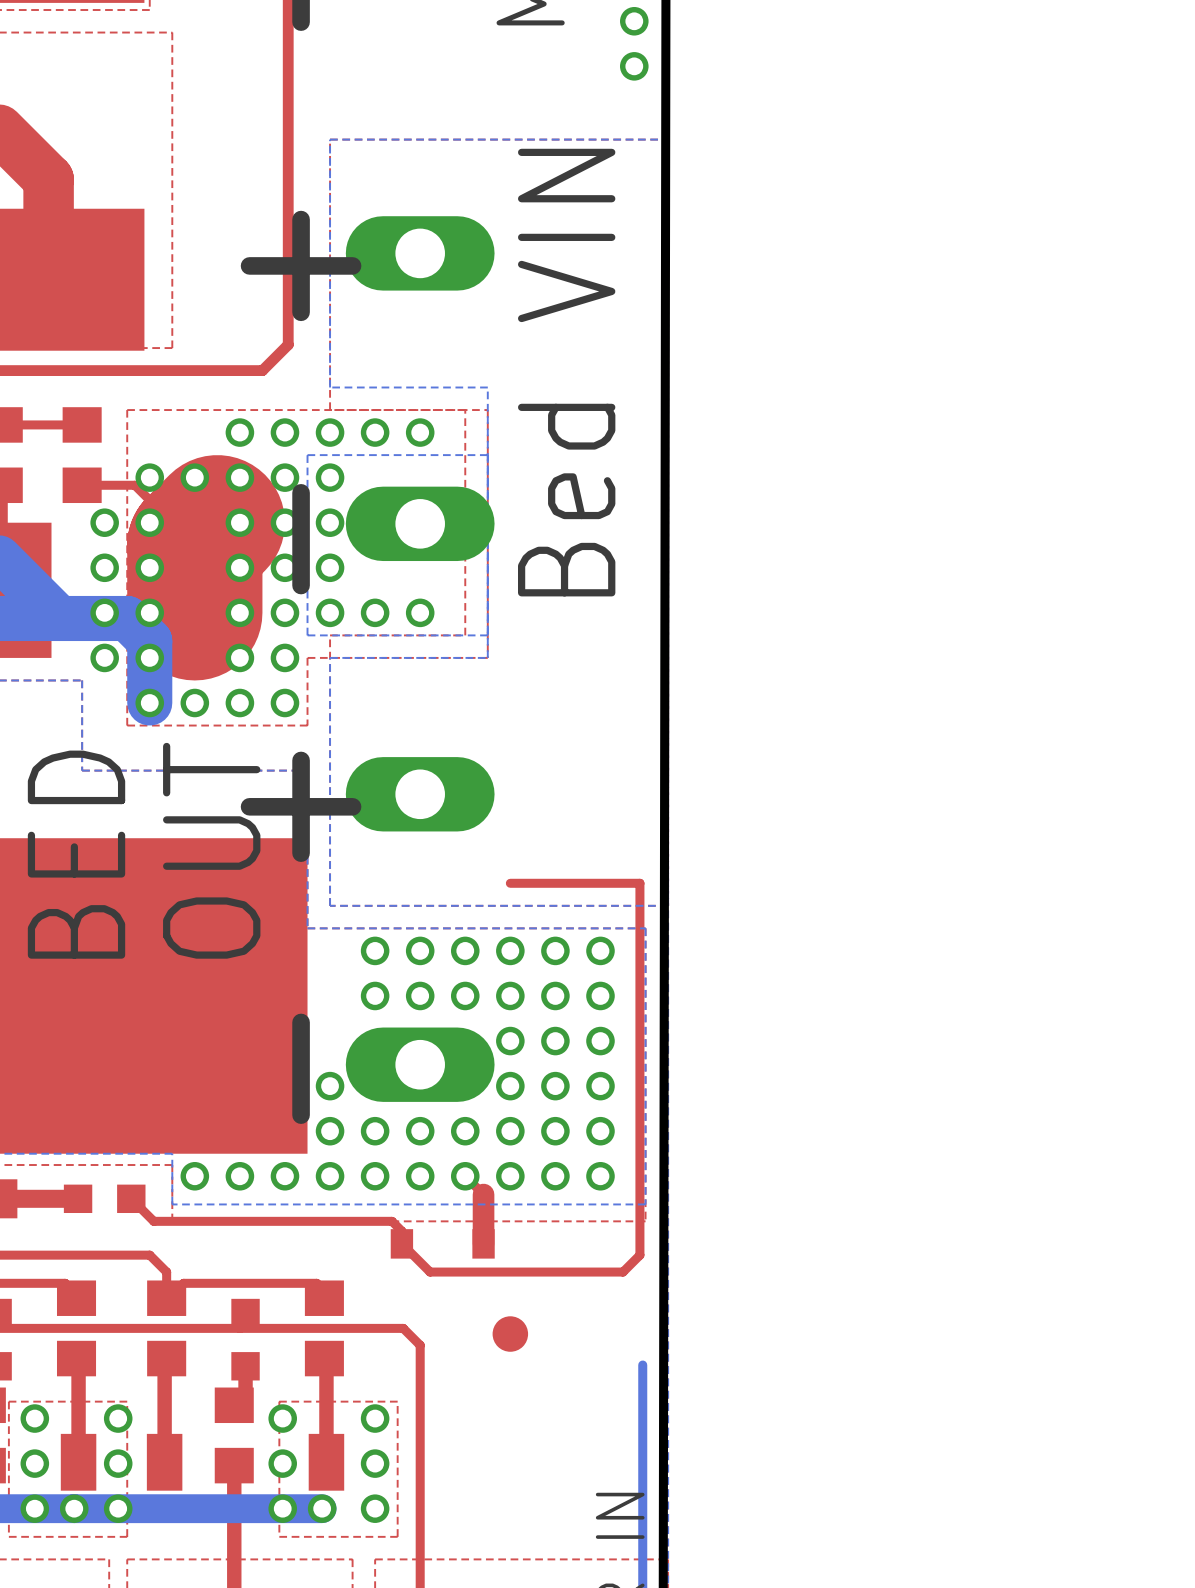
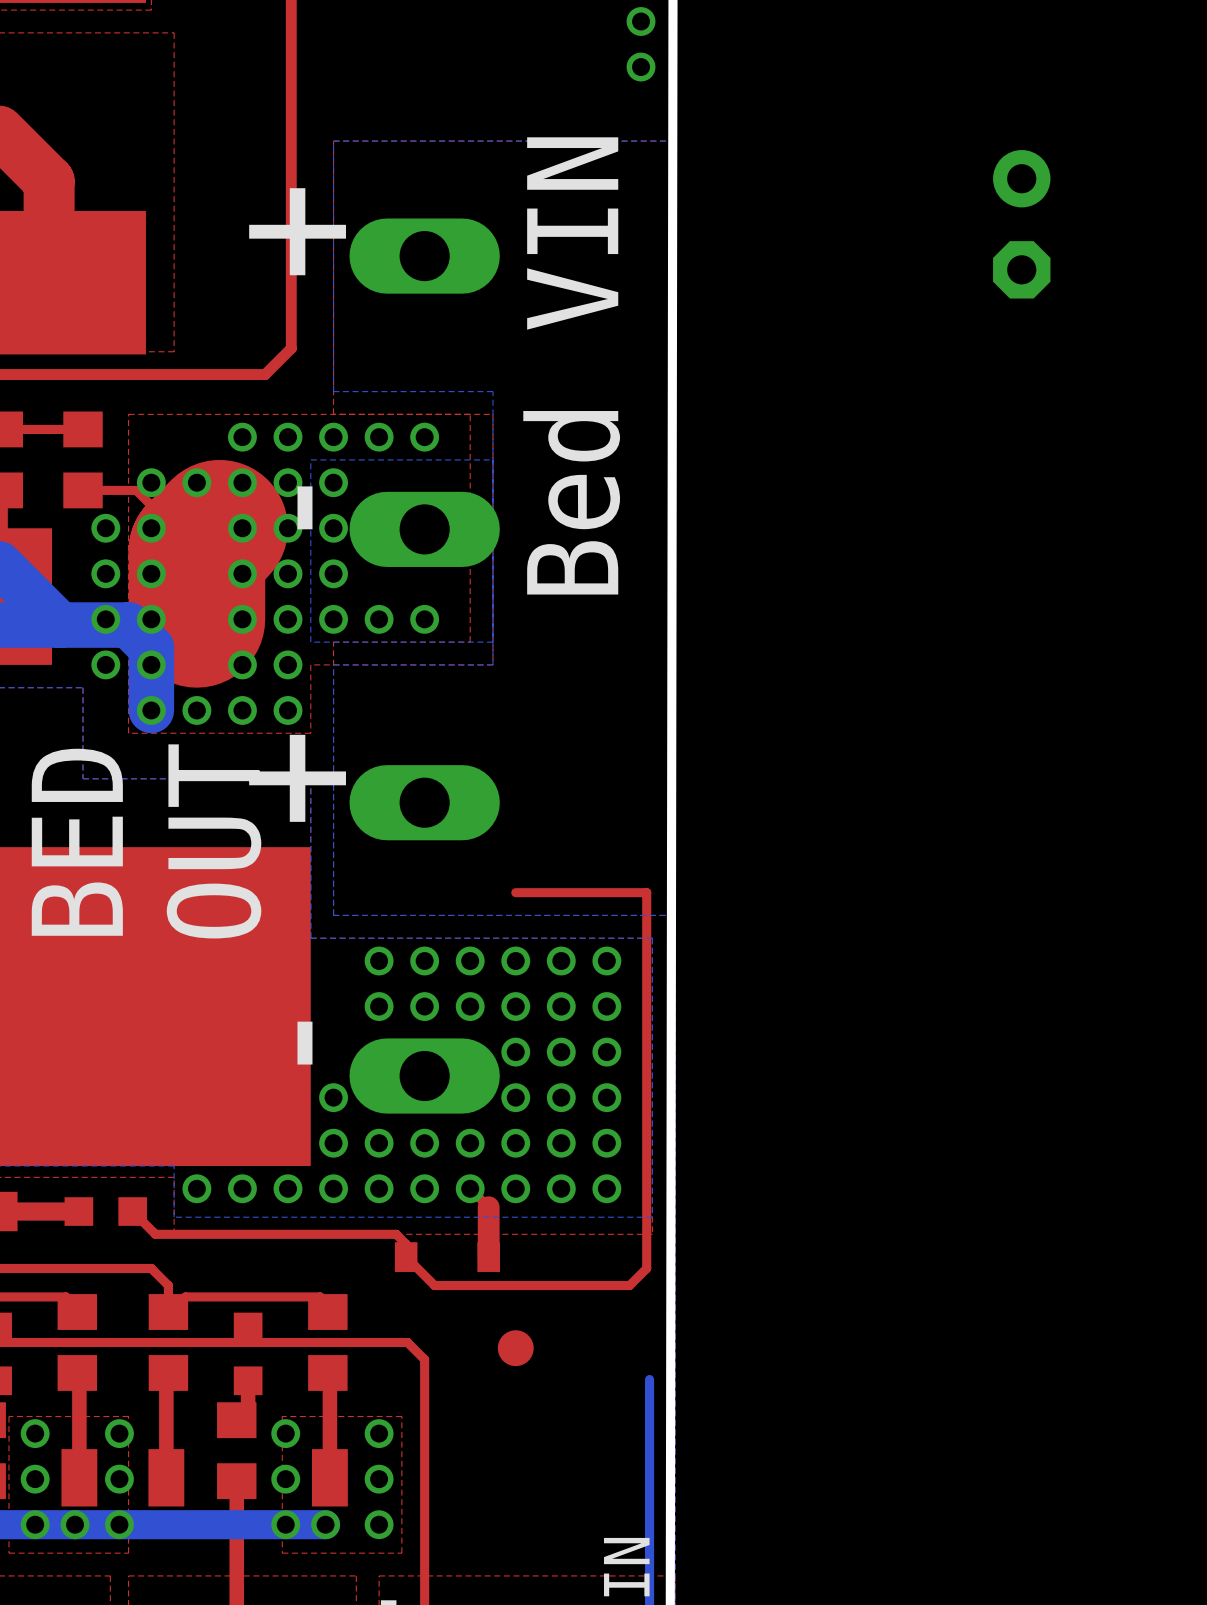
part: none -> (1021, 224)

